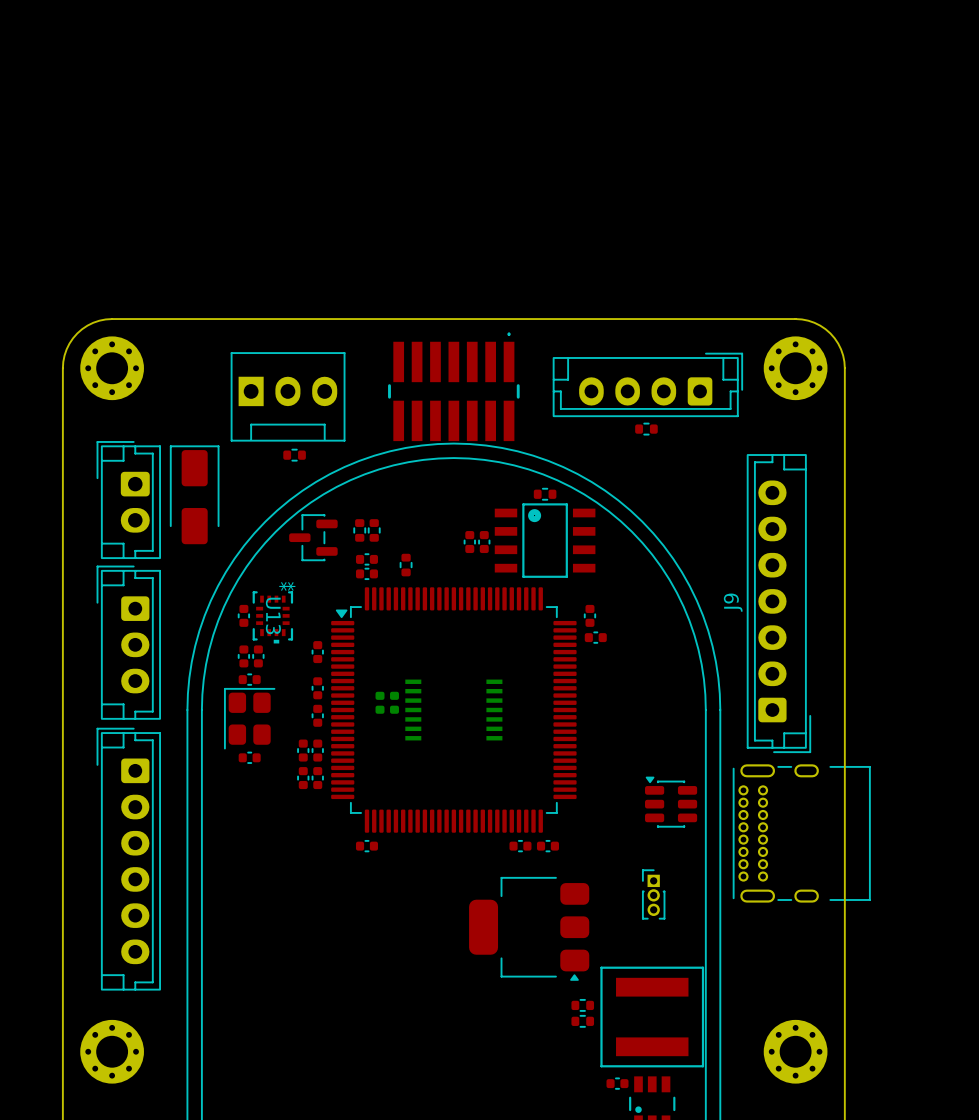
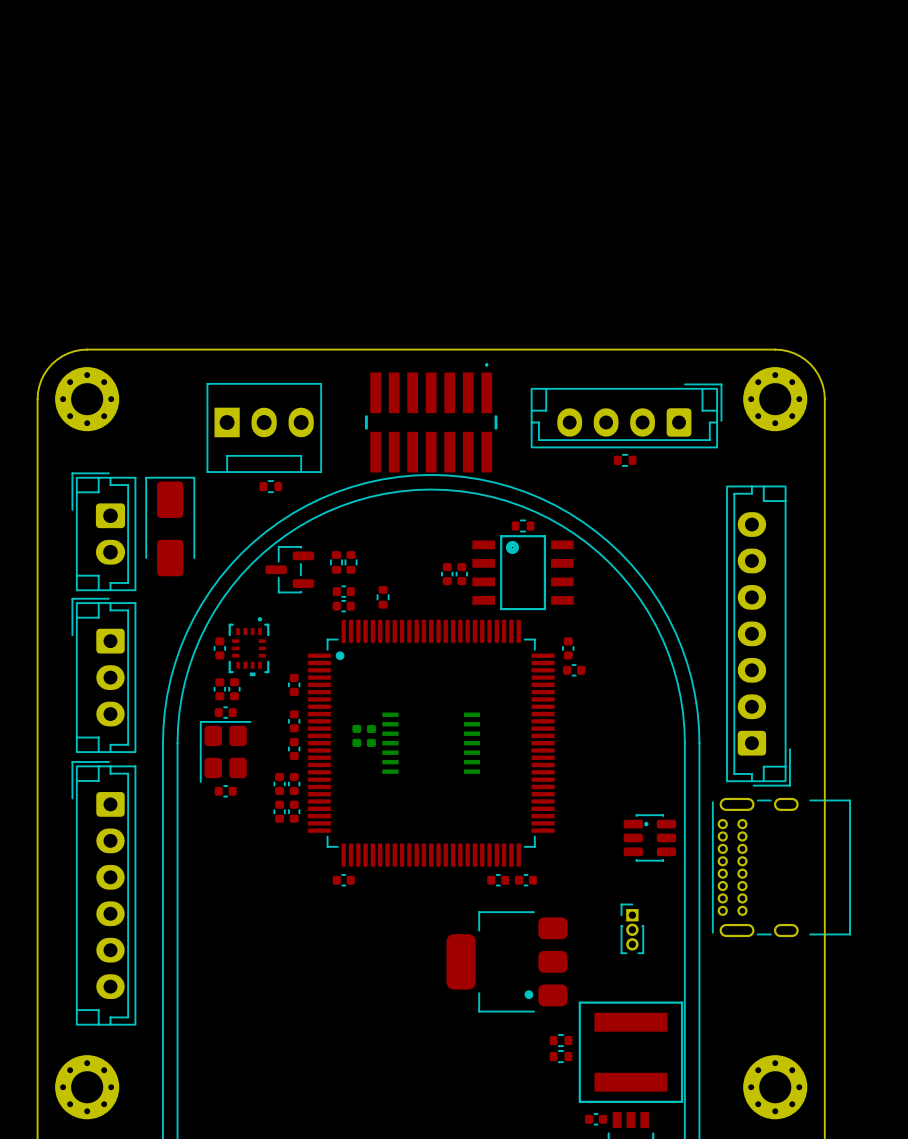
part footprint: [331, 587, 577, 833] -> [307, 619, 555, 867]
J9 name: J9 (733, 602) -> none
part: none -> (248, 646)
U13: (272, 617) -> none
part footprint: [645, 776, 698, 828] -> [623, 814, 677, 862]
part footprint: [469, 876, 590, 981] -> [446, 911, 568, 1013]

